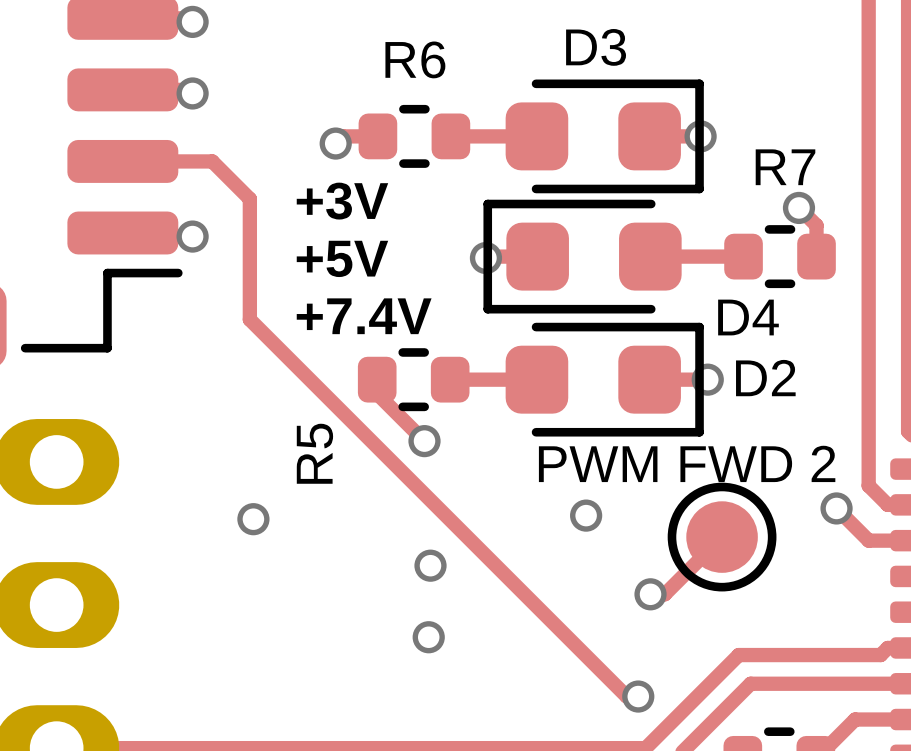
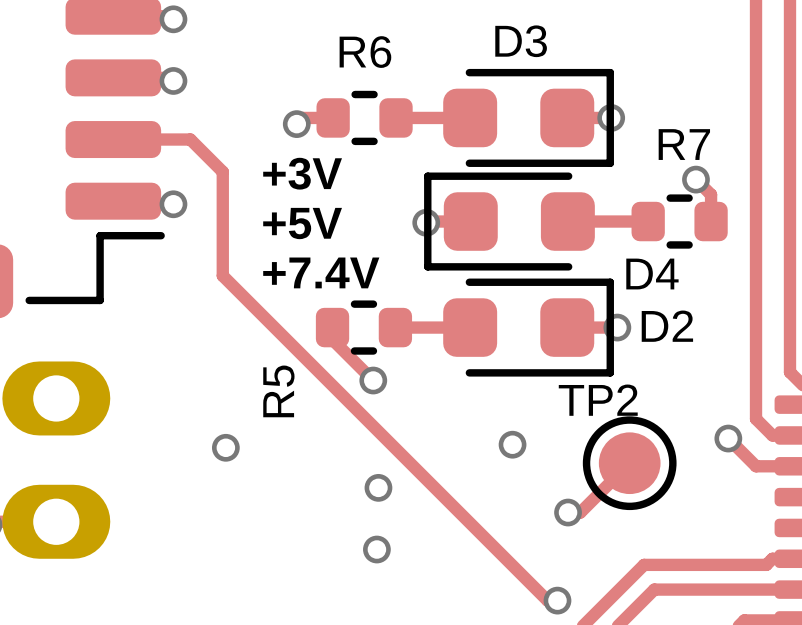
PWM FWD 2 name: PWM FWD 2 (687, 463) -> TP2 (598, 400)

